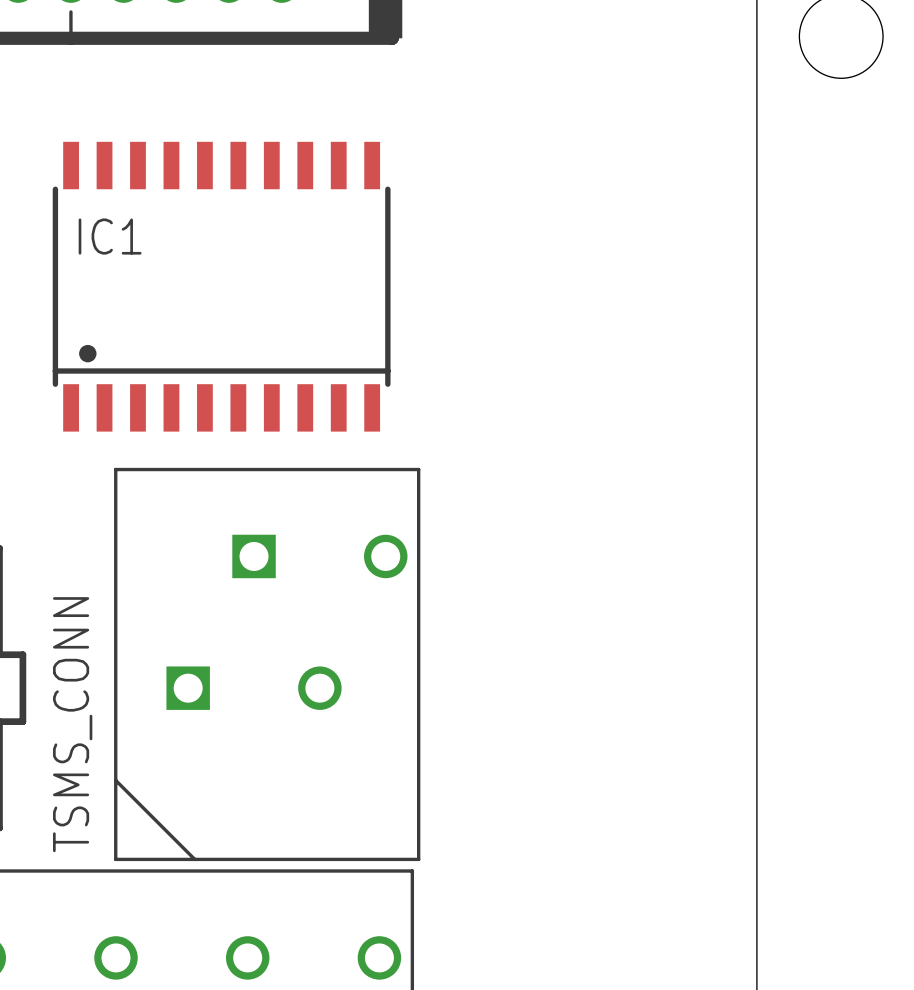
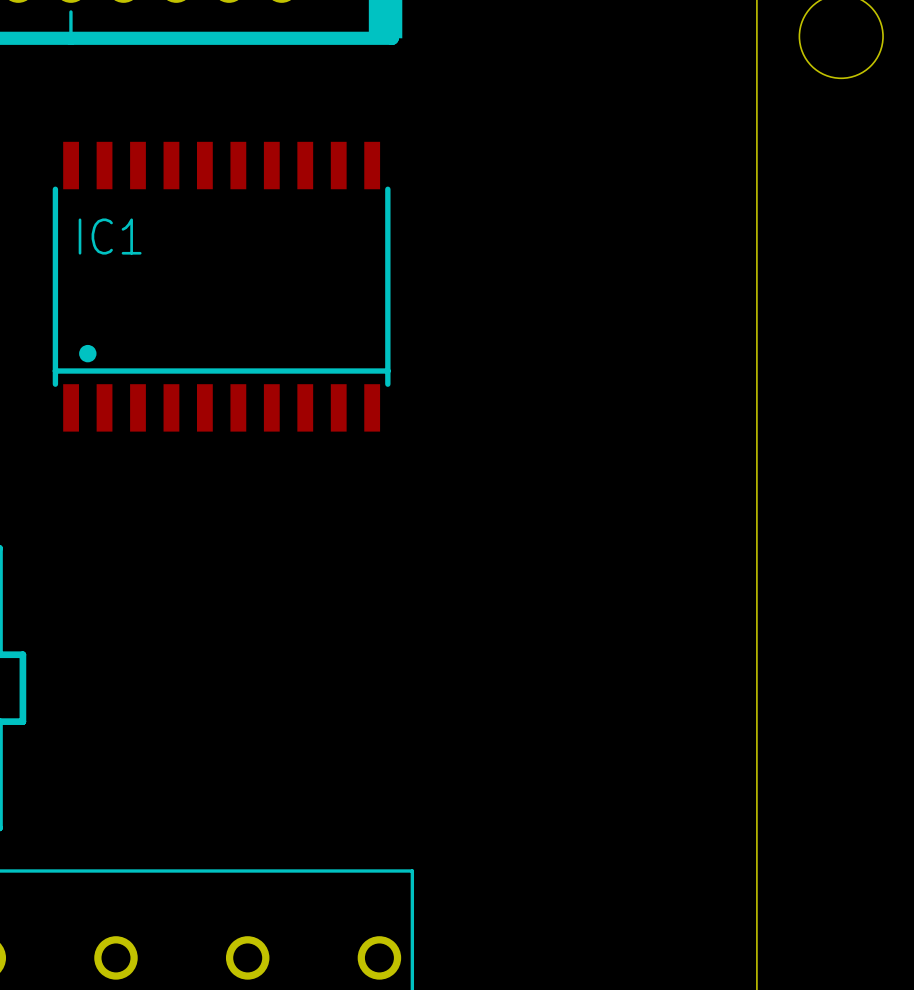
TSMS_CONN: (267, 664) -> none

